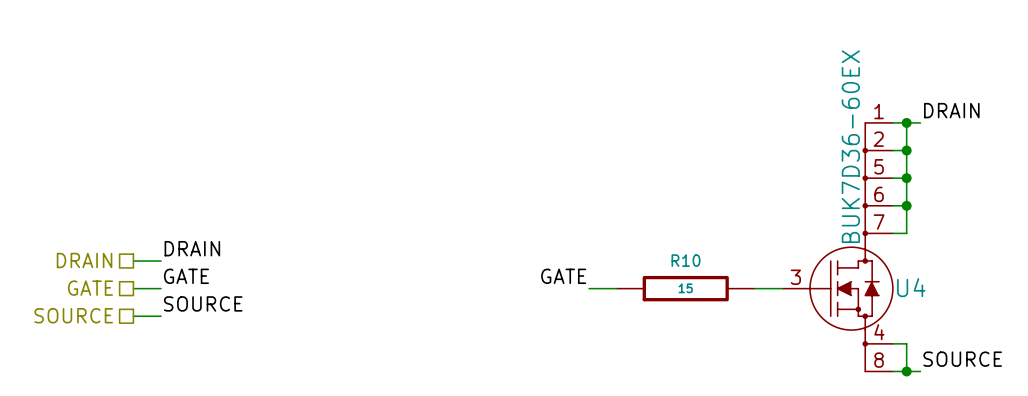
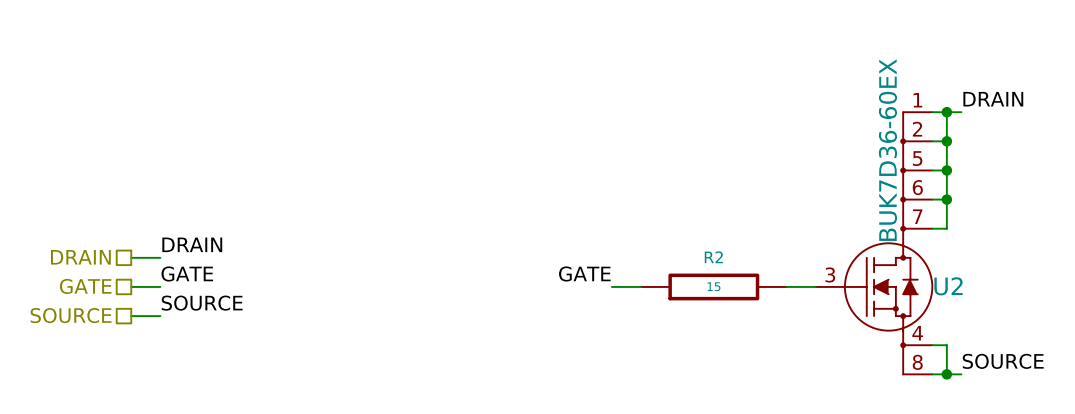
R10 name: R10 (686, 260) -> R2 (713, 257)
U4 name: U4 (911, 287) -> U2 (948, 286)

